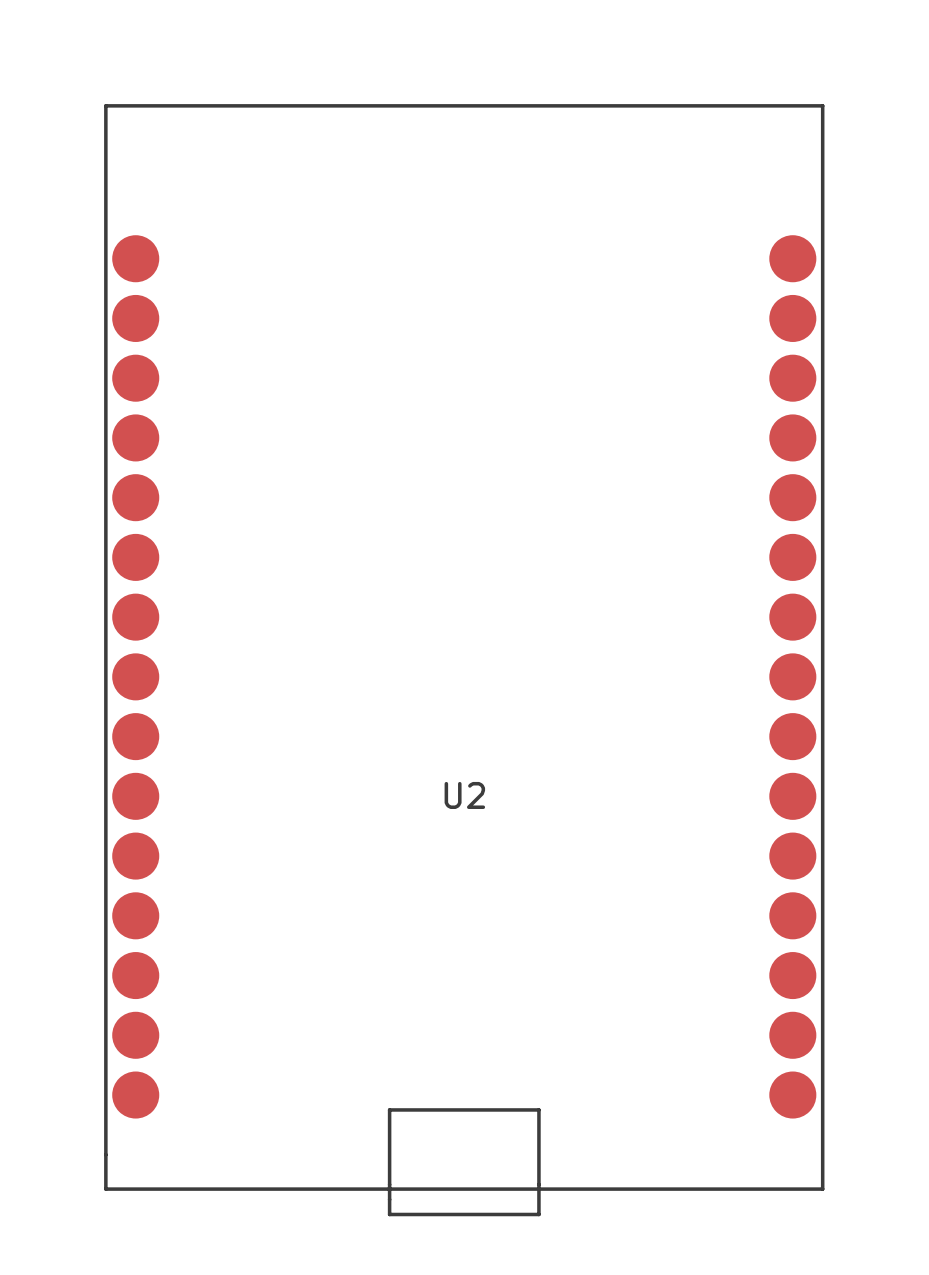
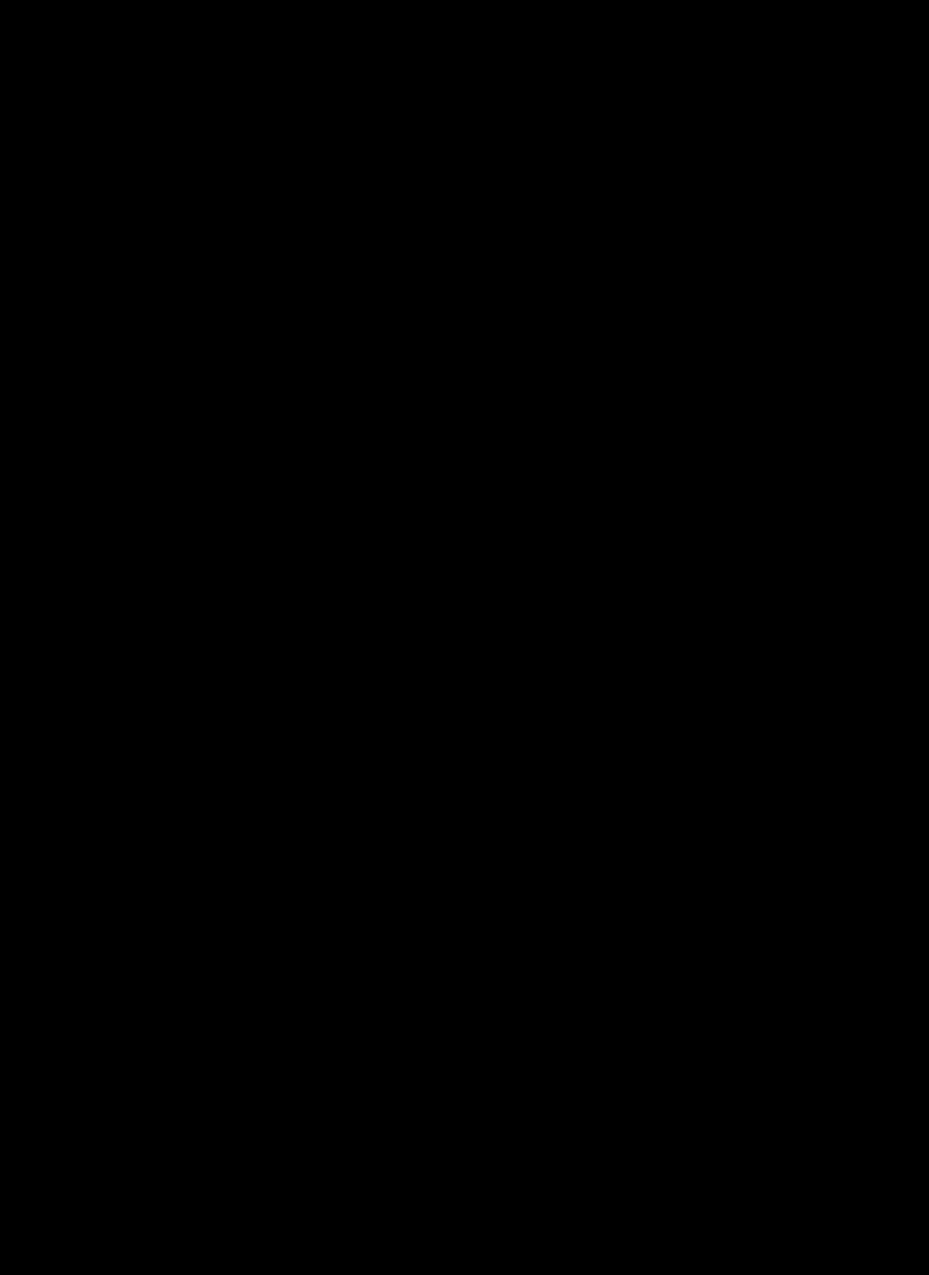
U2: (464, 660) -> none

